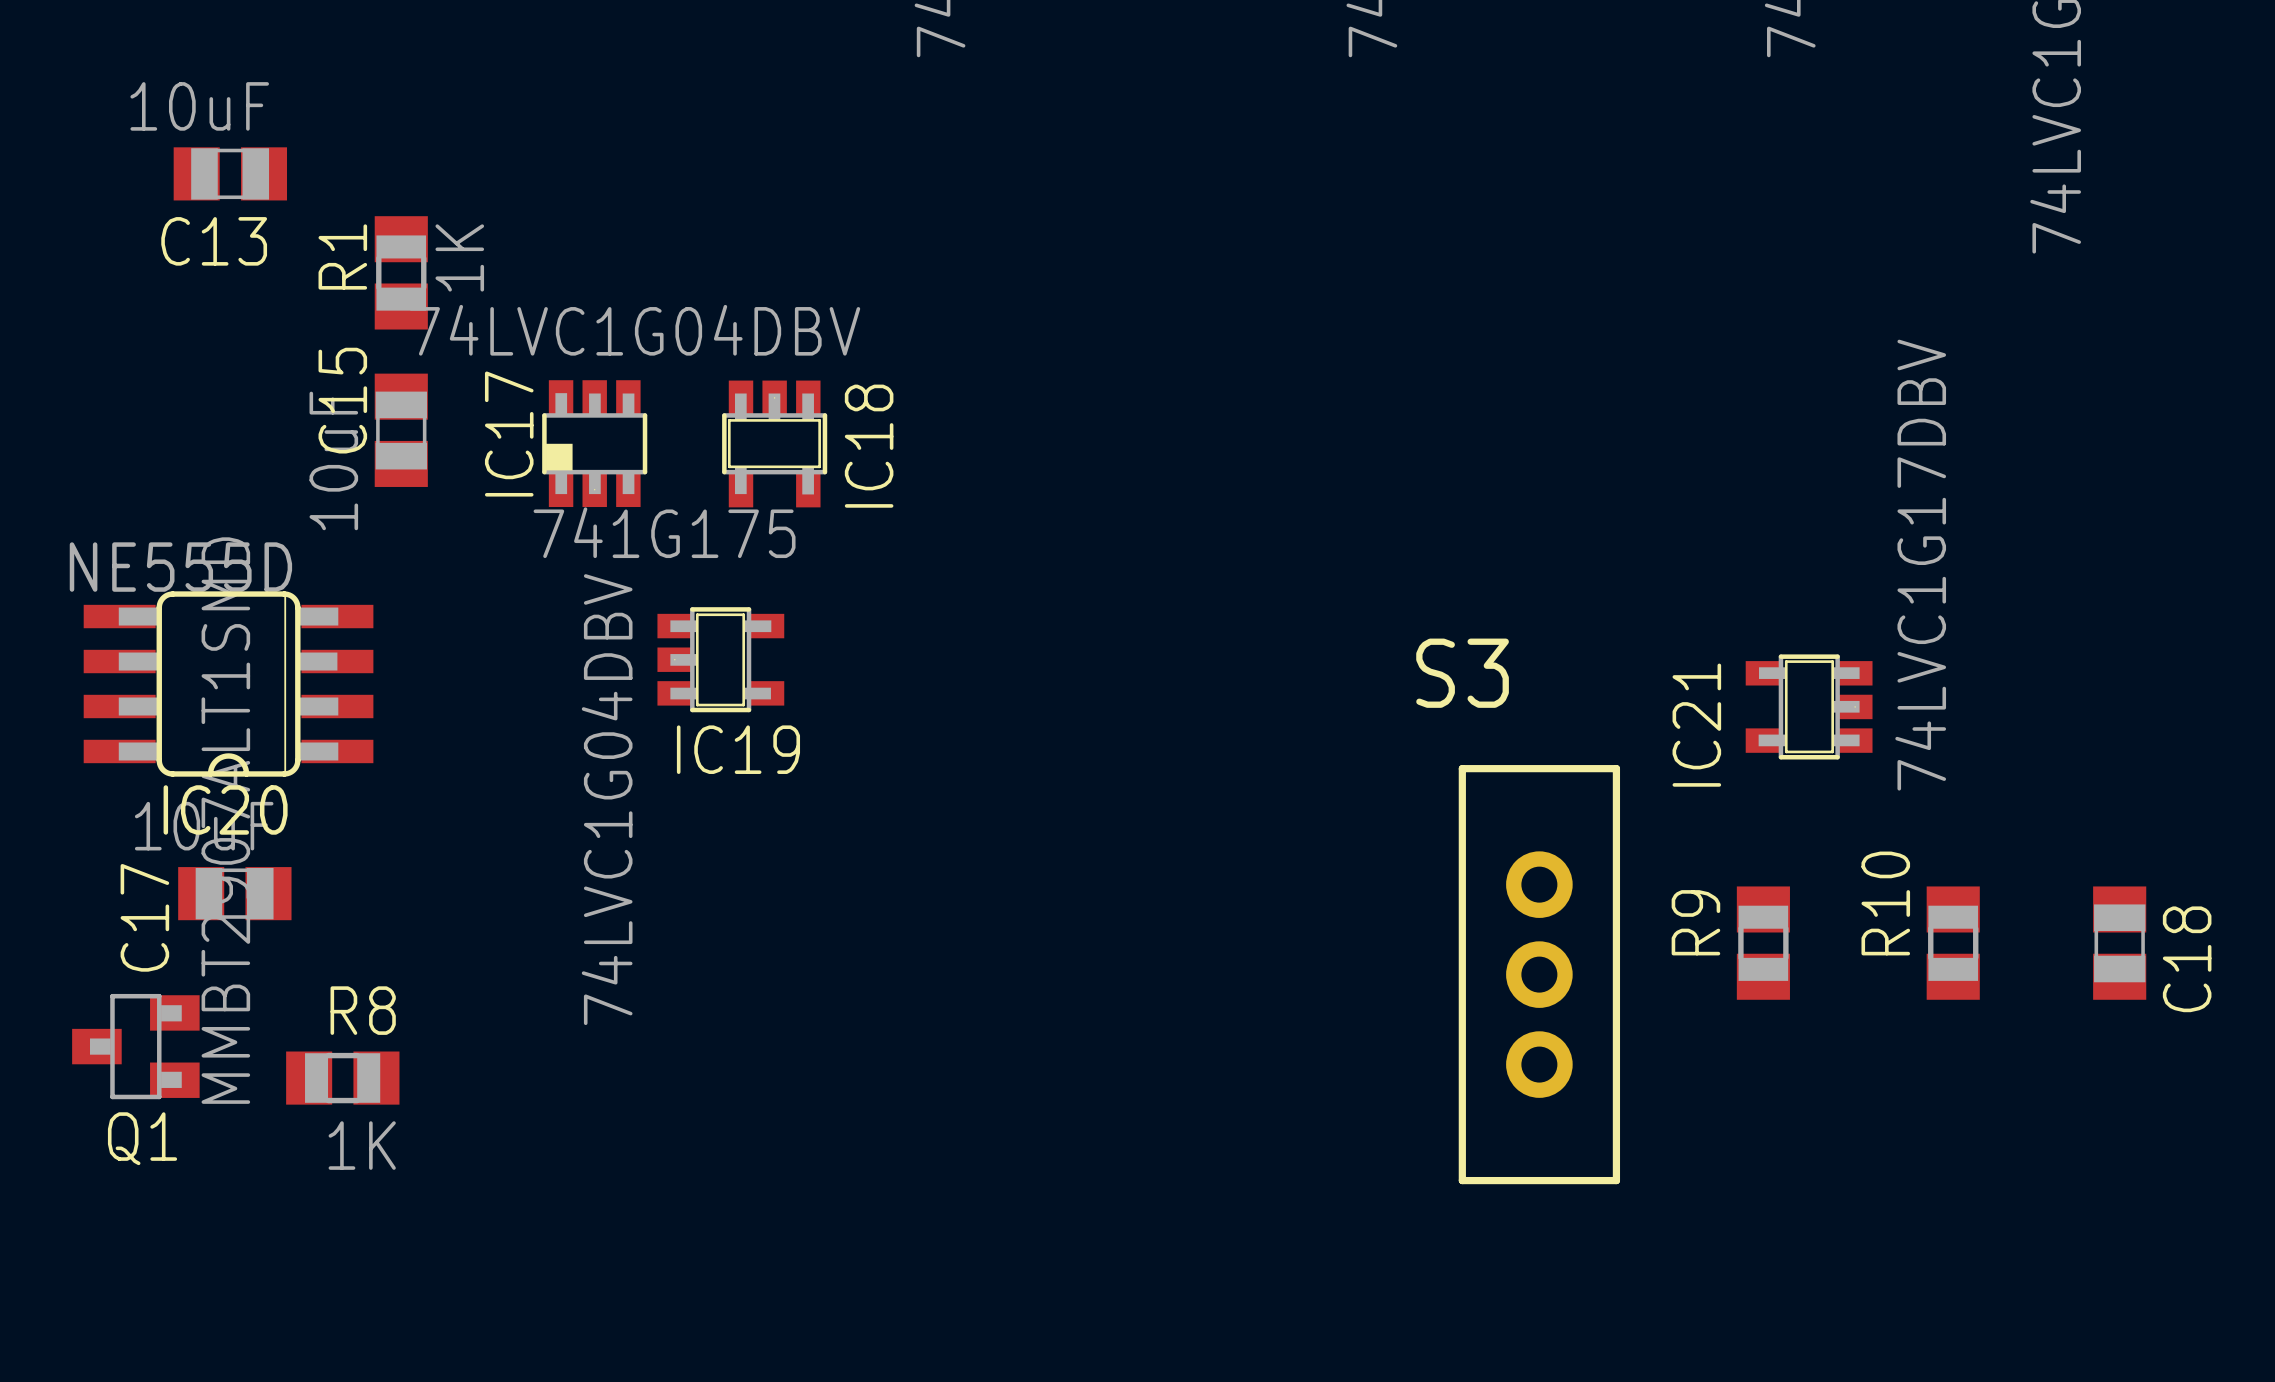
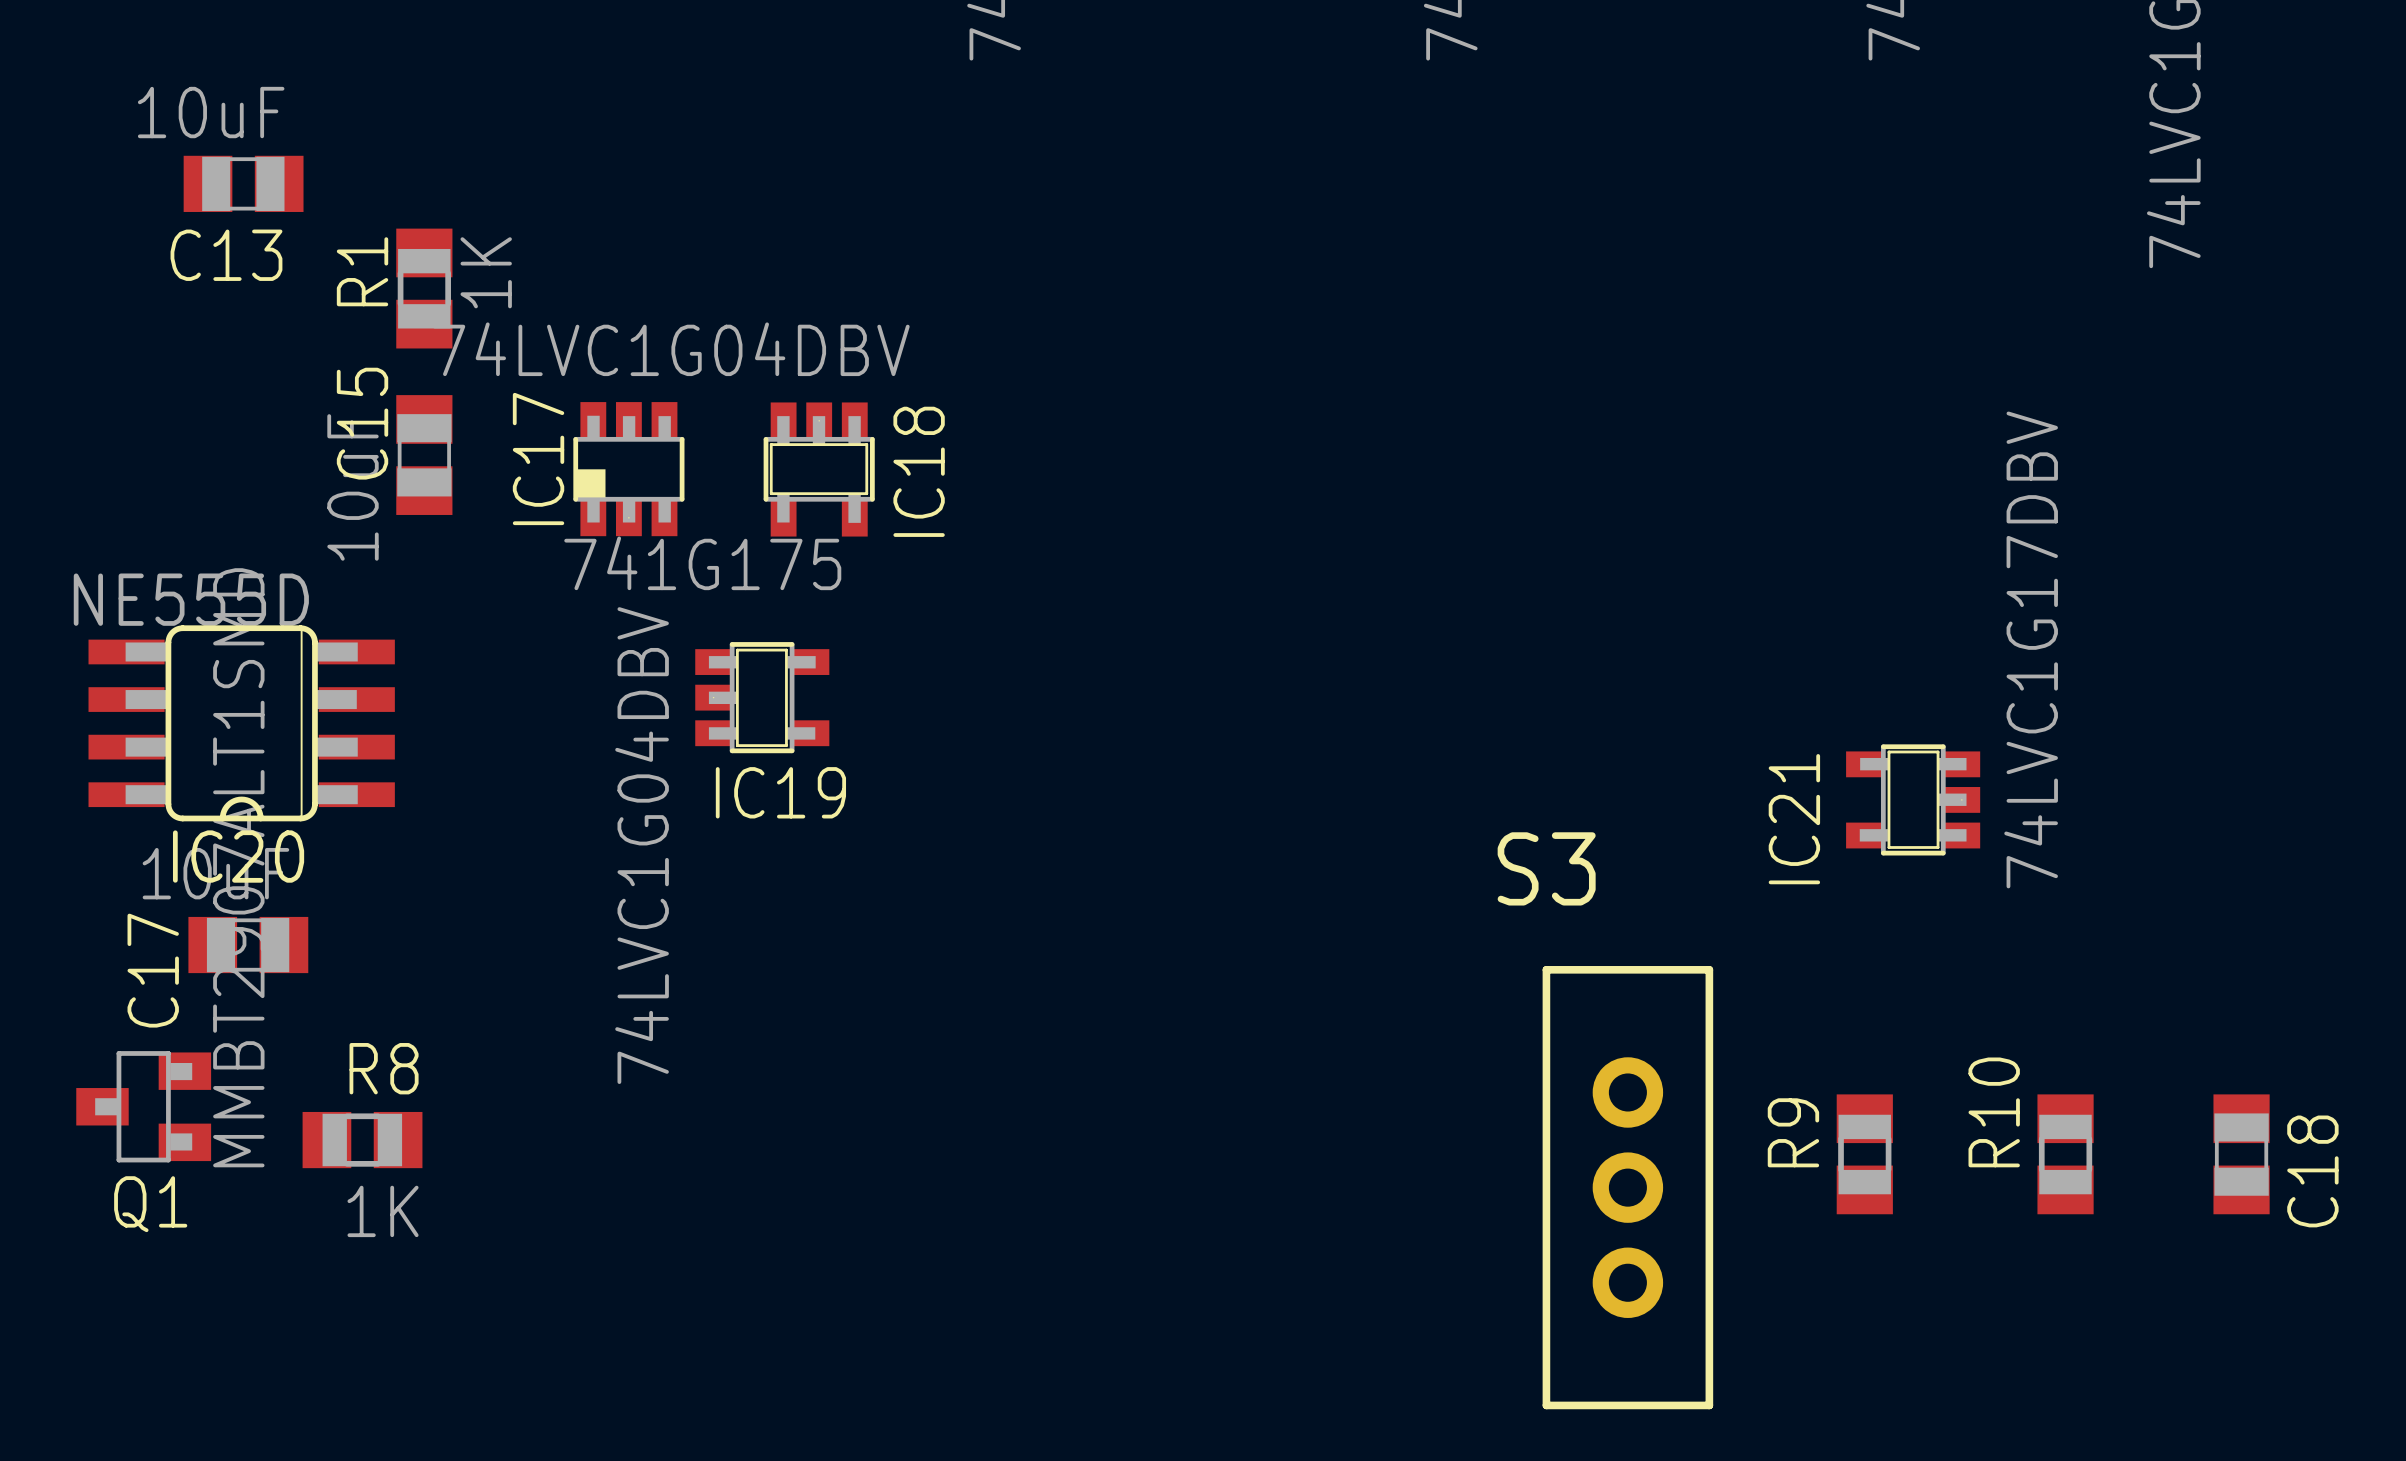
IC21 position: (1809, 706) -> (1913, 799)
R9 position: (1763, 943) -> (1864, 1154)
R10 position: (1953, 943) -> (2065, 1154)
C18 position: (2119, 943) -> (2241, 1154)
S3 position: (1539, 974) -> (1627, 1187)

